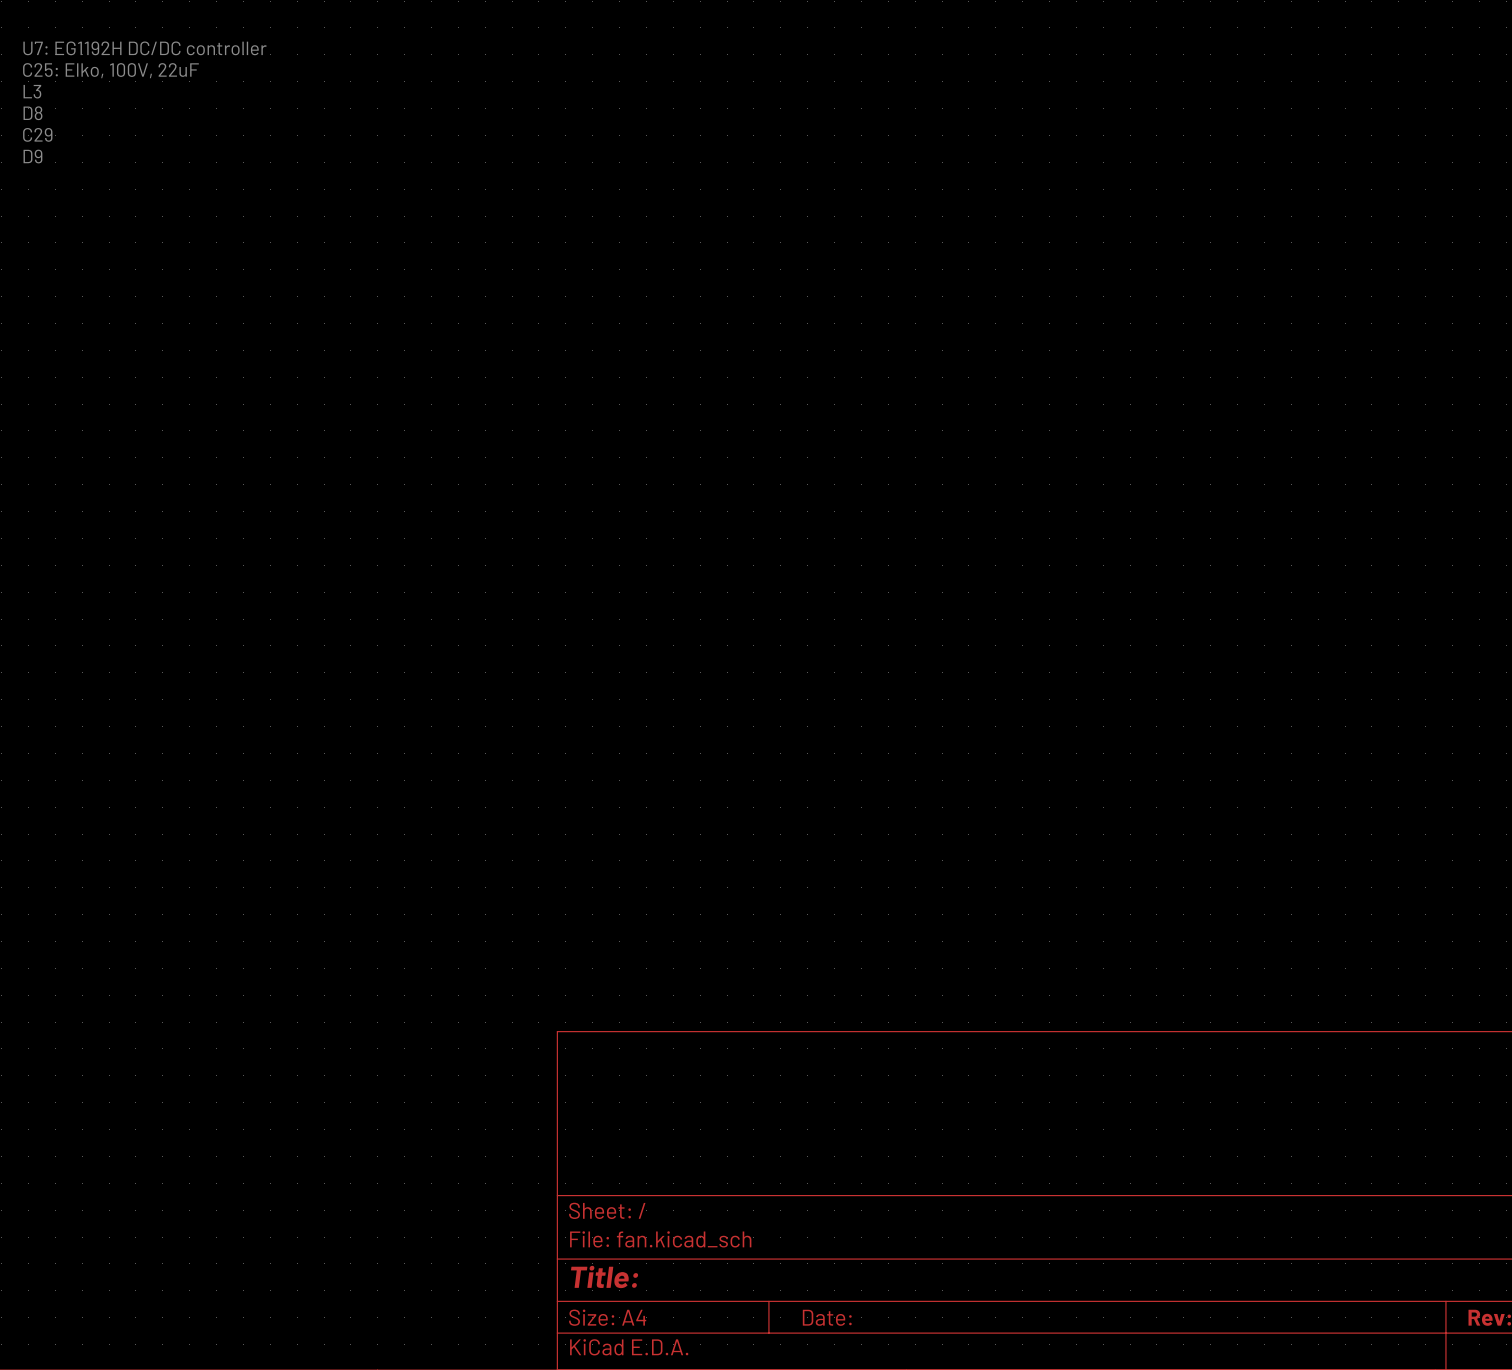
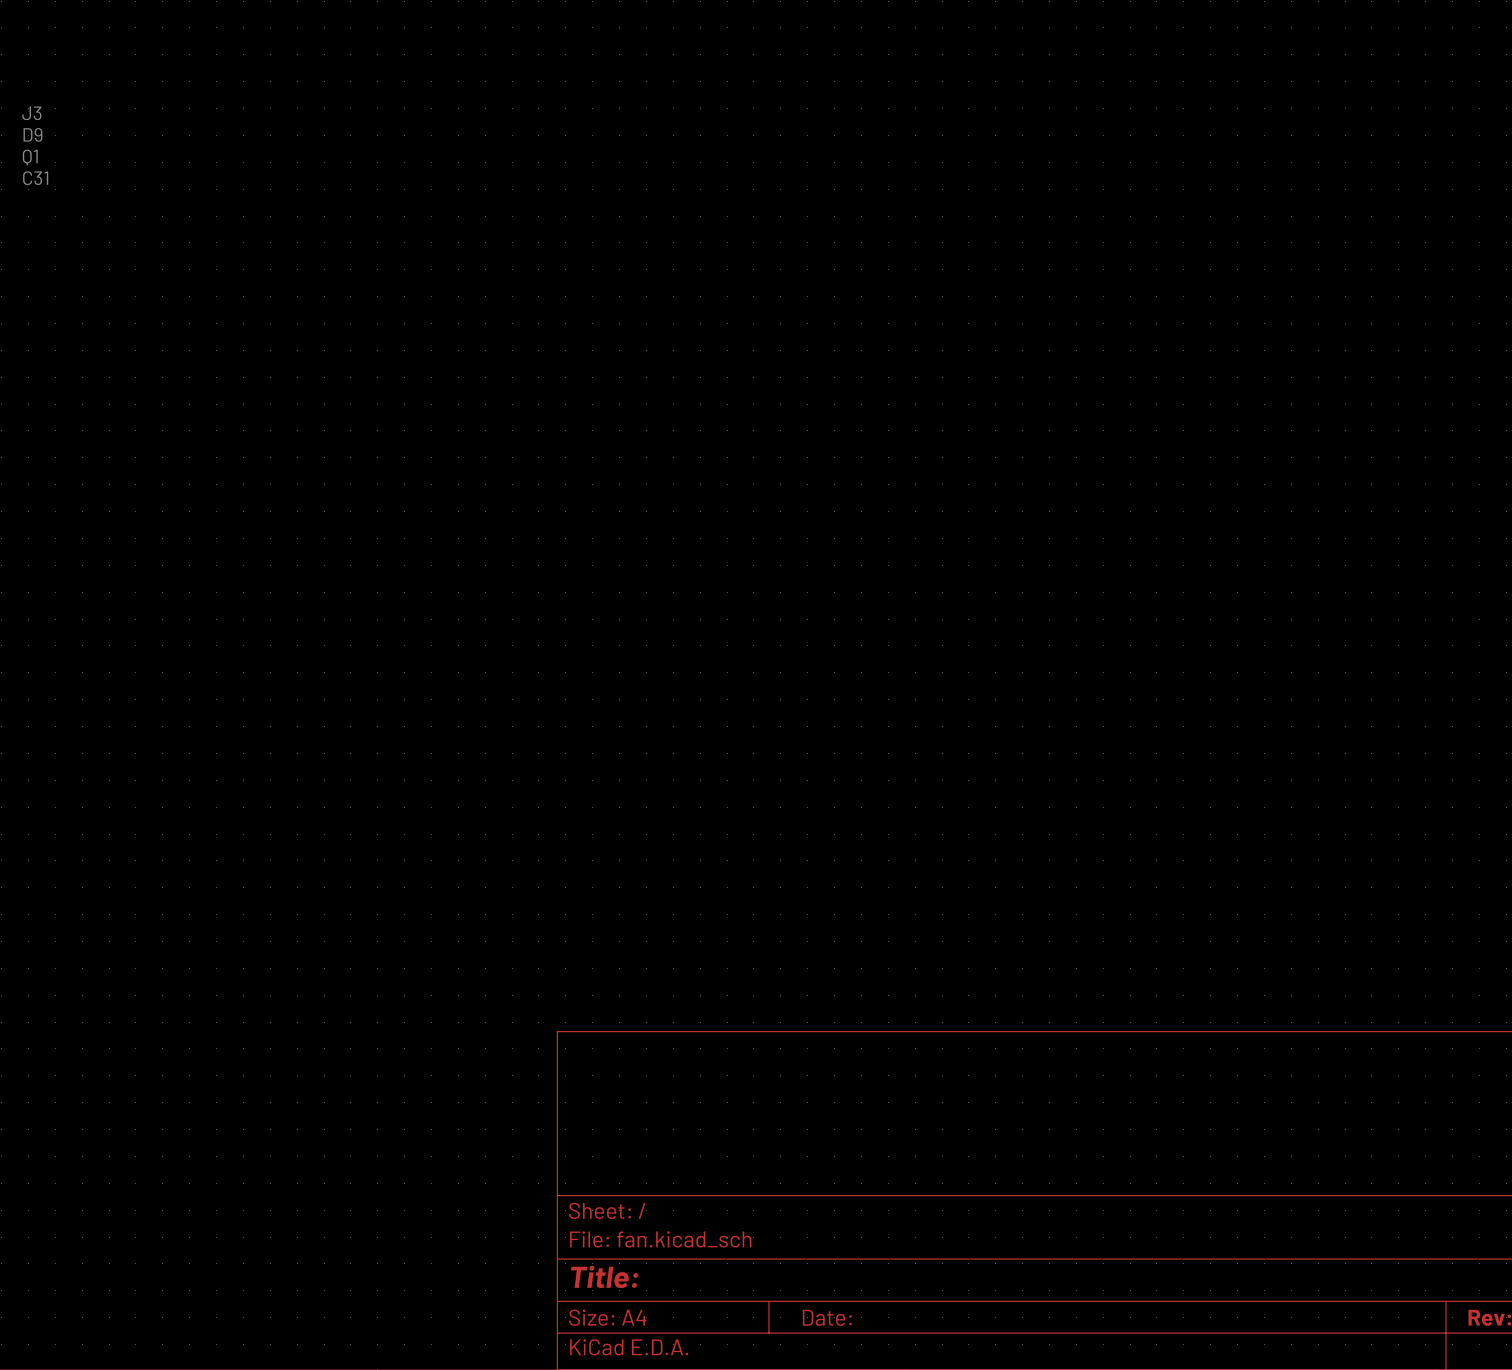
text: U7: EG1192H DC/DC controller (144, 48) -> none
text: C25: Elko, 100V, 22uF (110, 70) -> none
text: L3 (32, 91) -> none
text: D8 (32, 113) -> J3 (31, 113)
text: C29 (37, 134) -> D9 (32, 134)
text: D9 (32, 156) -> Q1 (30, 157)
text: none -> C31 (35, 178)

